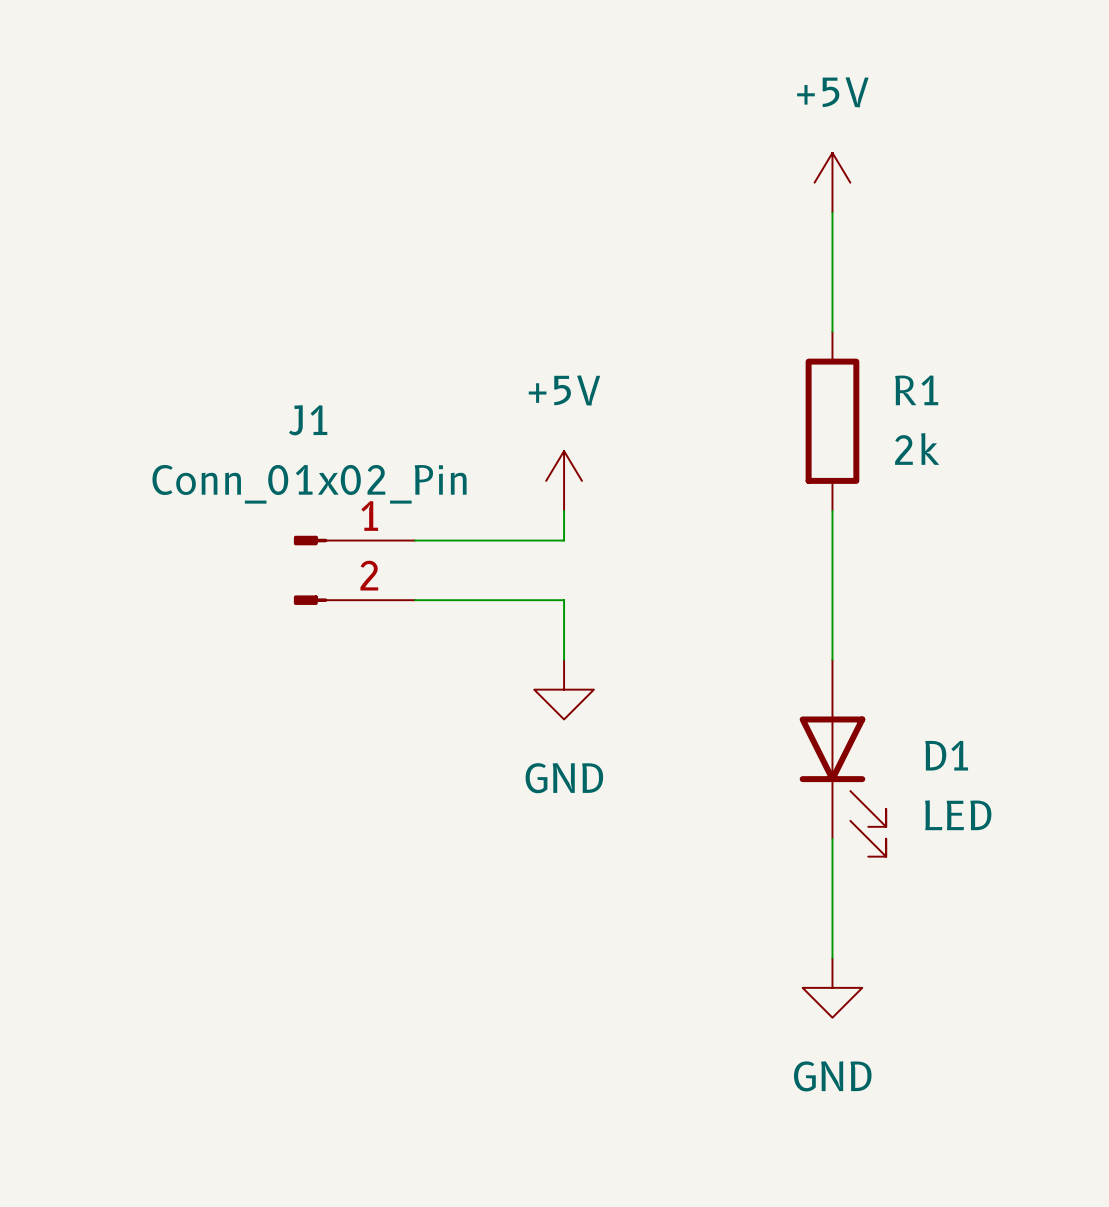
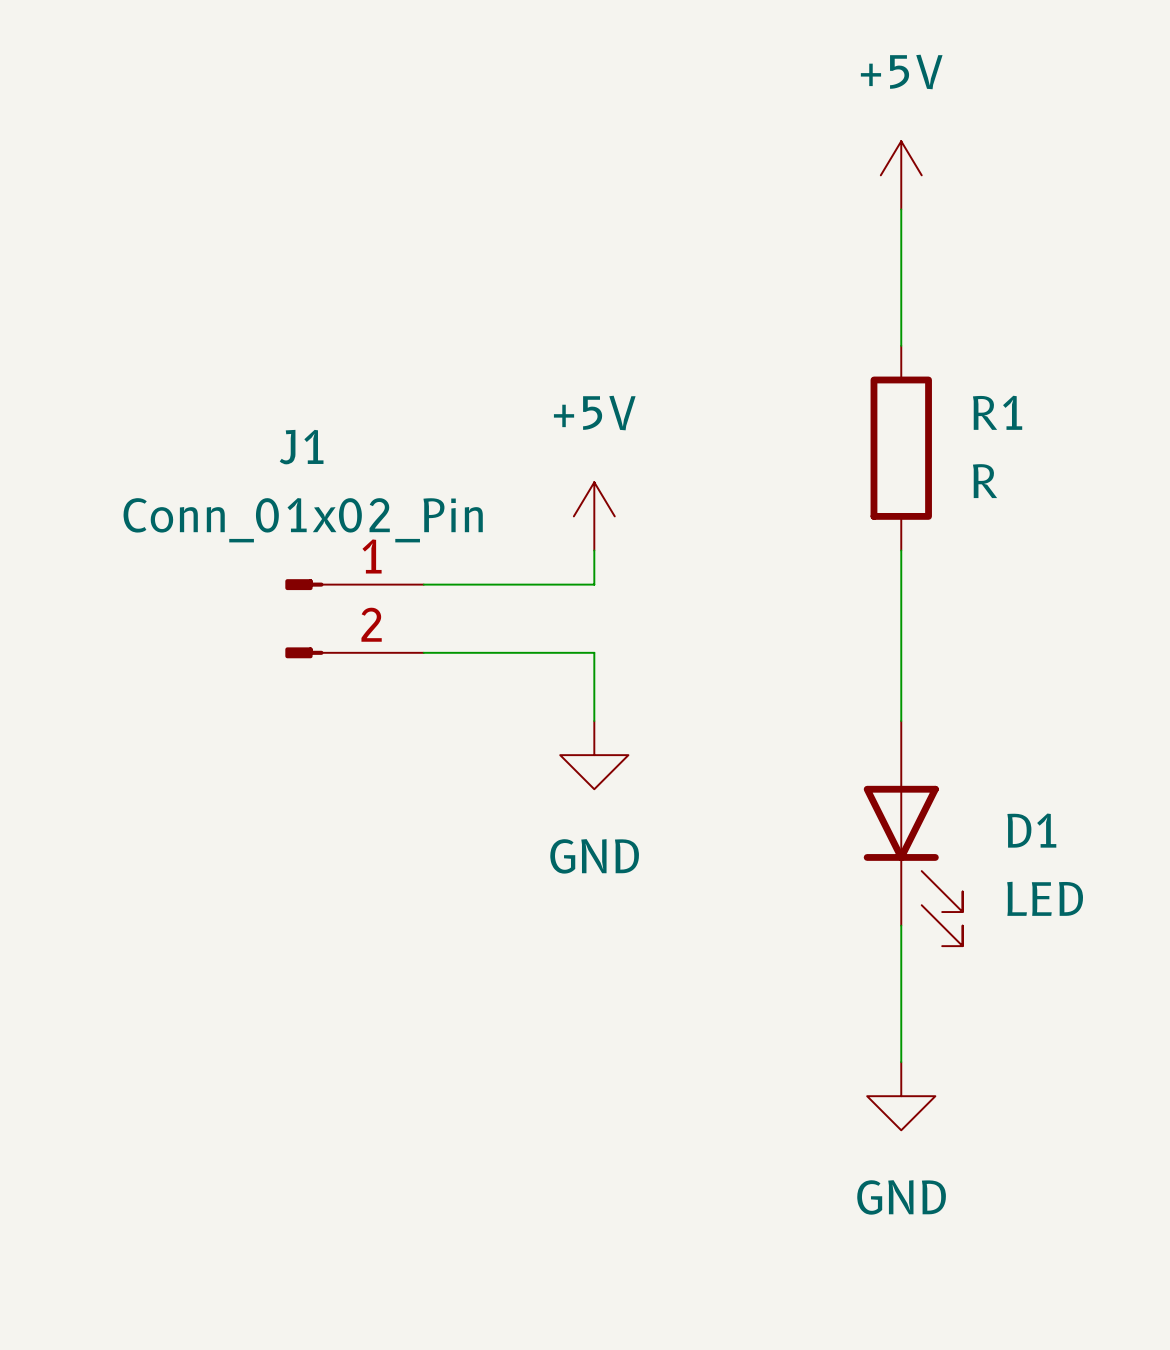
R1 value: 2k (917, 448) -> R (985, 481)

